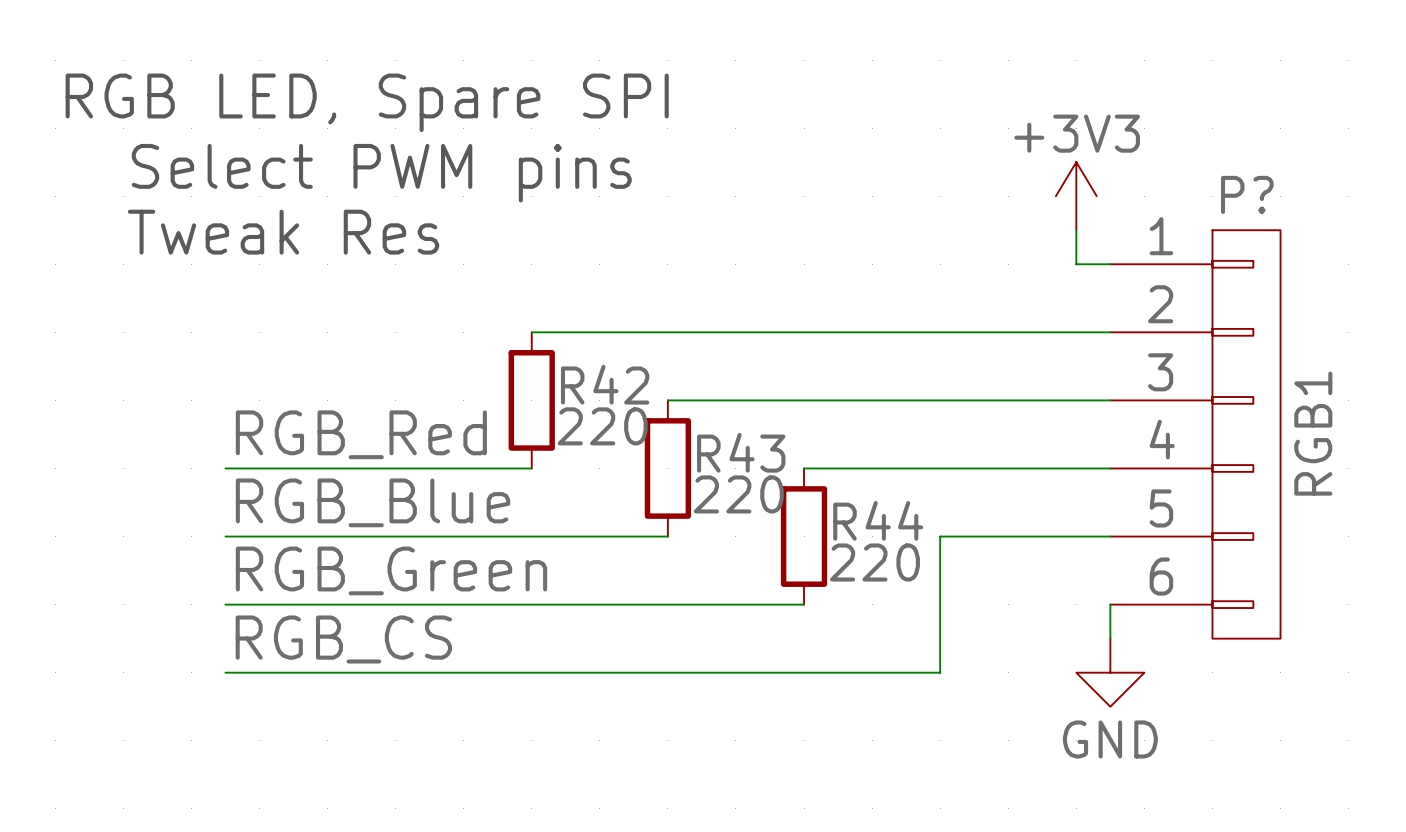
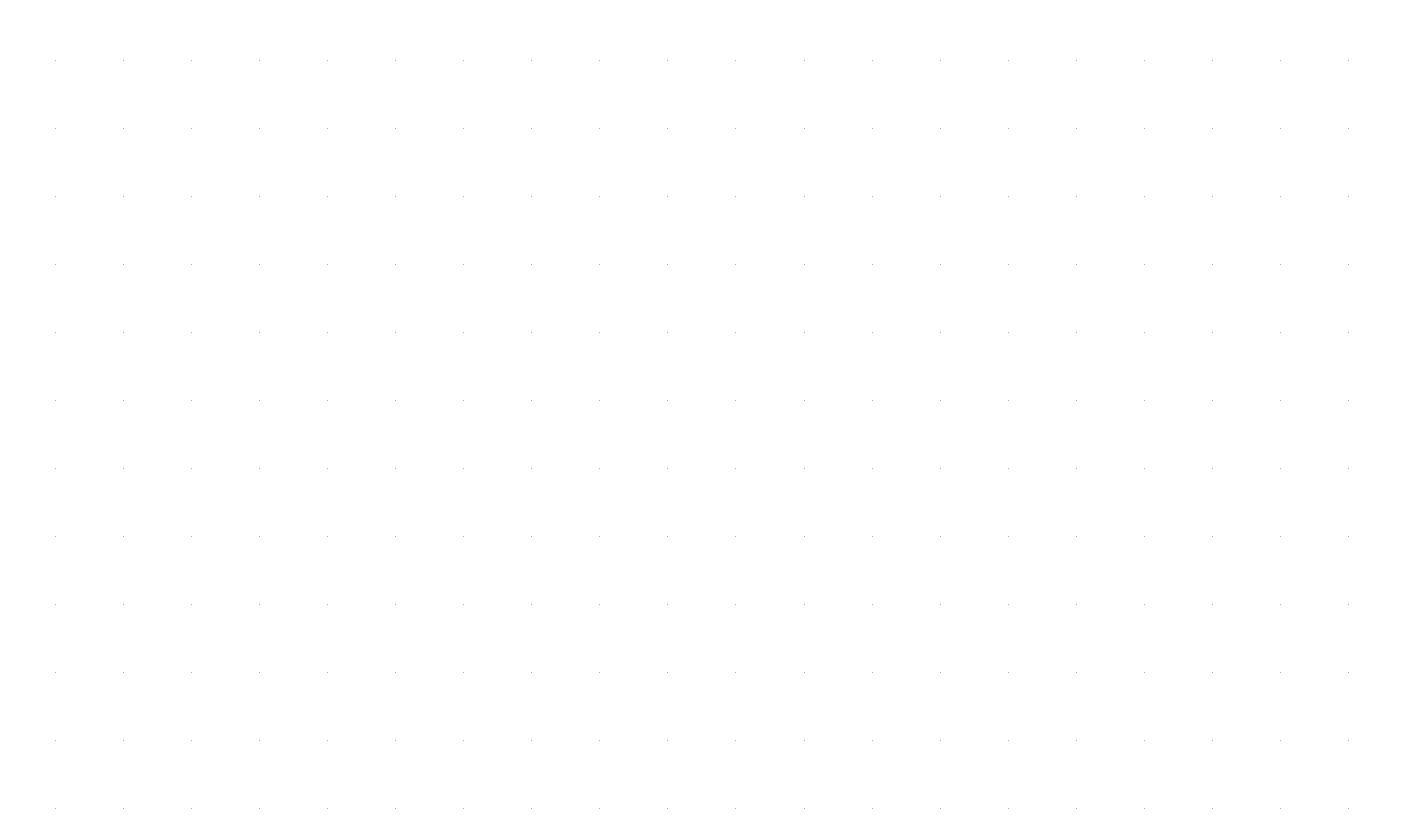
text: RGB LED, Spare SPI (367, 102) -> none
text: Select PWM pins (381, 173) -> none
power symbol: +3V3 (1076, 196) -> none
wire: (1076, 230) (1076, 264) (1110, 264) -> none
text: Tweak Res (283, 232) -> none
wire: (531, 332) (1110, 332) -> none
R42: 220 (531, 400) -> none
wire: (667, 400) (1110, 400) -> none
label: RGB_Red (361, 434) -> none
P?: RGB1 (1195, 434) -> none
wire: (225, 468) (531, 468) -> none
R43: 220 (667, 468) -> none
wire: (804, 468) (1110, 468) -> none
label: RGB_Blue (373, 502) -> none
wire: (225, 536) (667, 536) -> none
R44: 220 (804, 536) -> none
wire: (1110, 536) (940, 536) (940, 672) (225, 672) -> none
label: RGB_Green (391, 570) -> none
wire: (225, 604) (804, 604) -> none
wire: (1110, 604) (1110, 638) -> none
label: RGB_CS (343, 639) -> none
power symbol: GND (1110, 672) -> none

